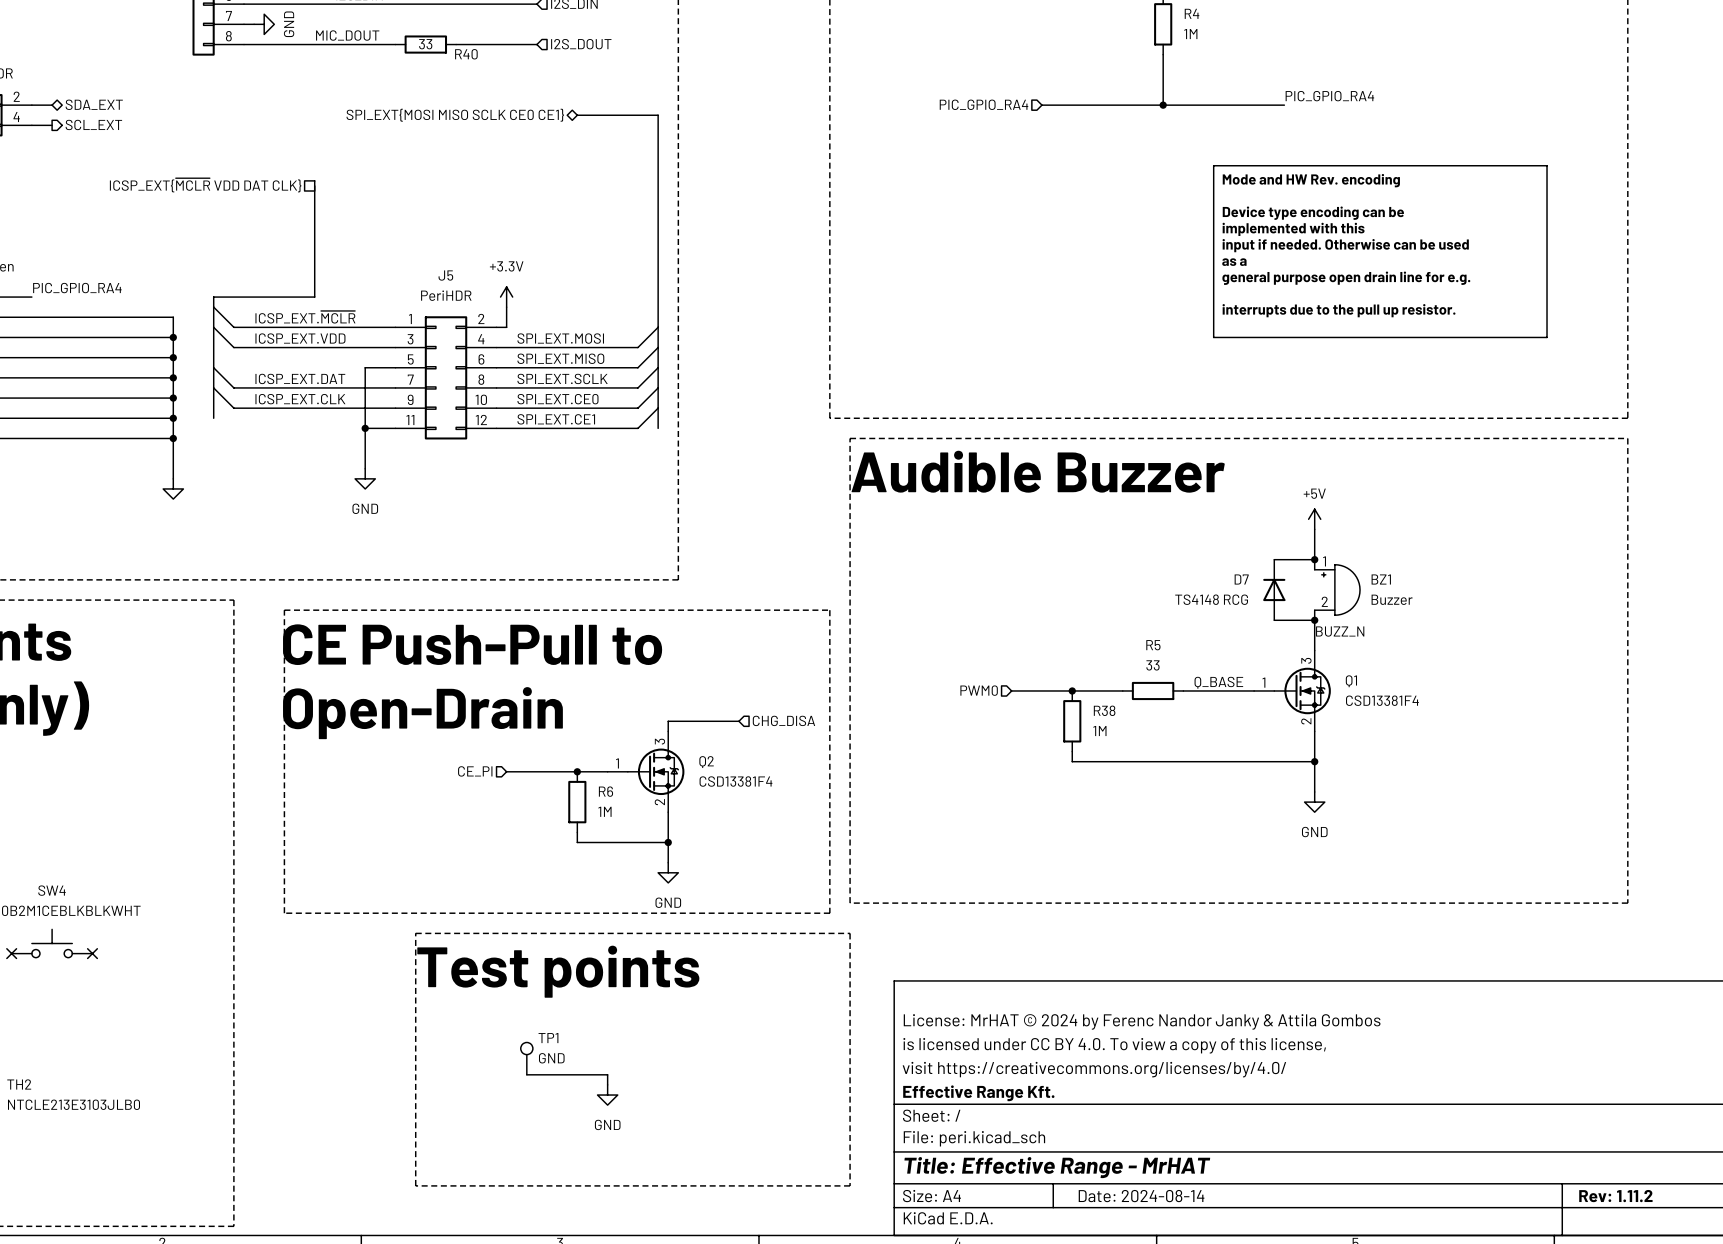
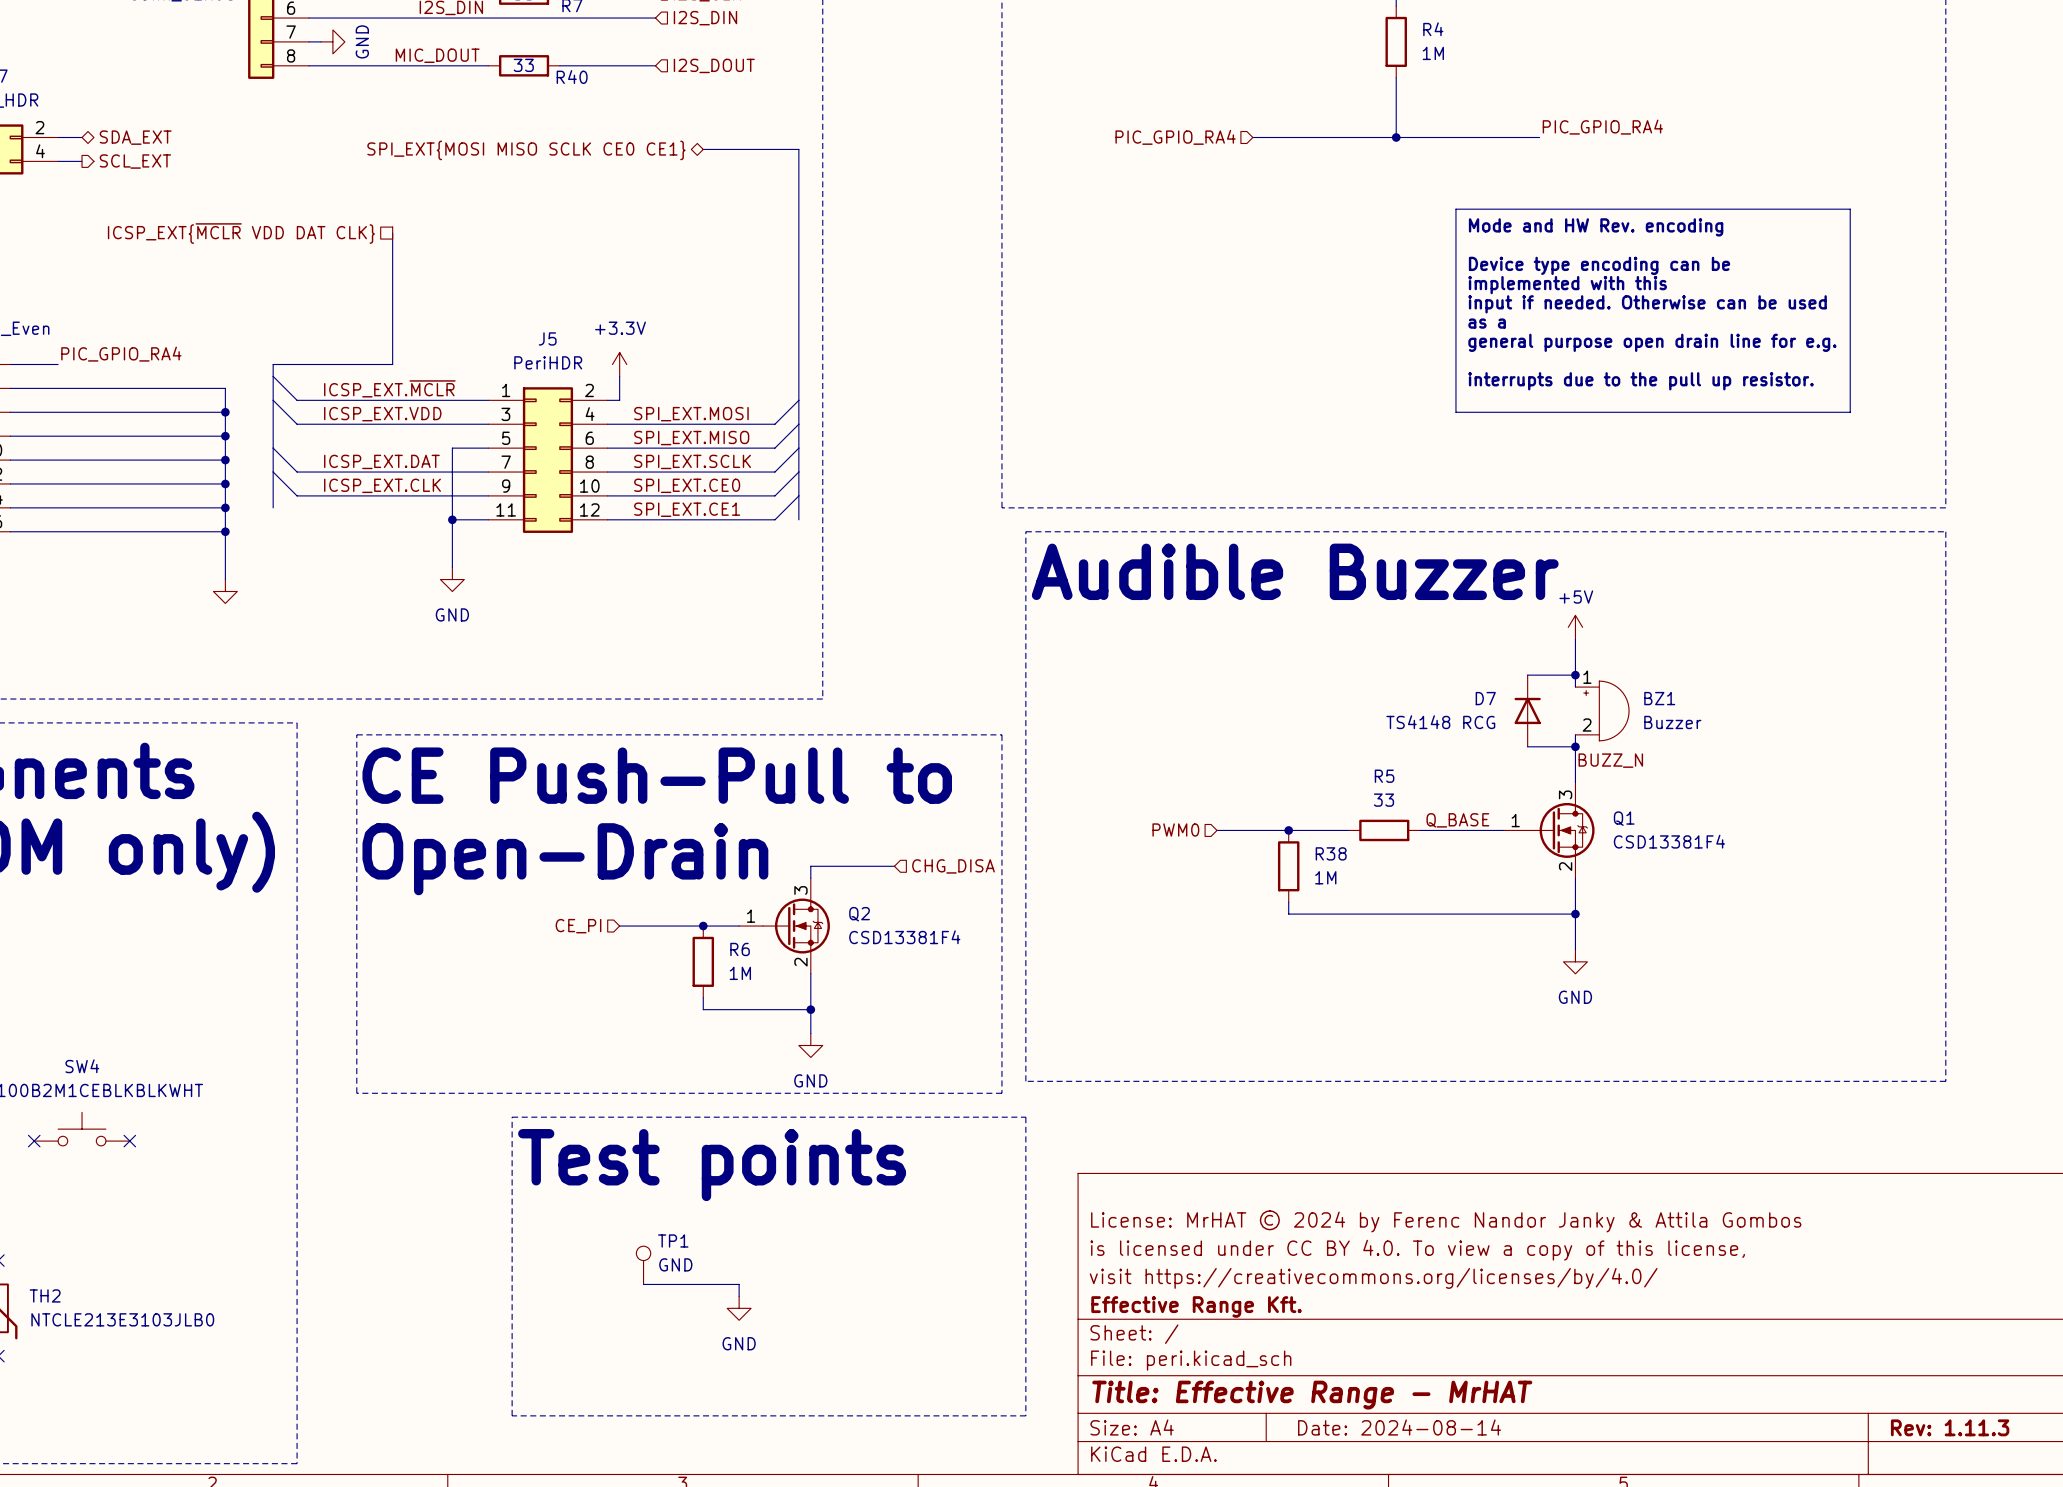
title block: Rev: 1.11.2 (1615, 1196) -> Rev: 1.11.3 (1950, 1427)

